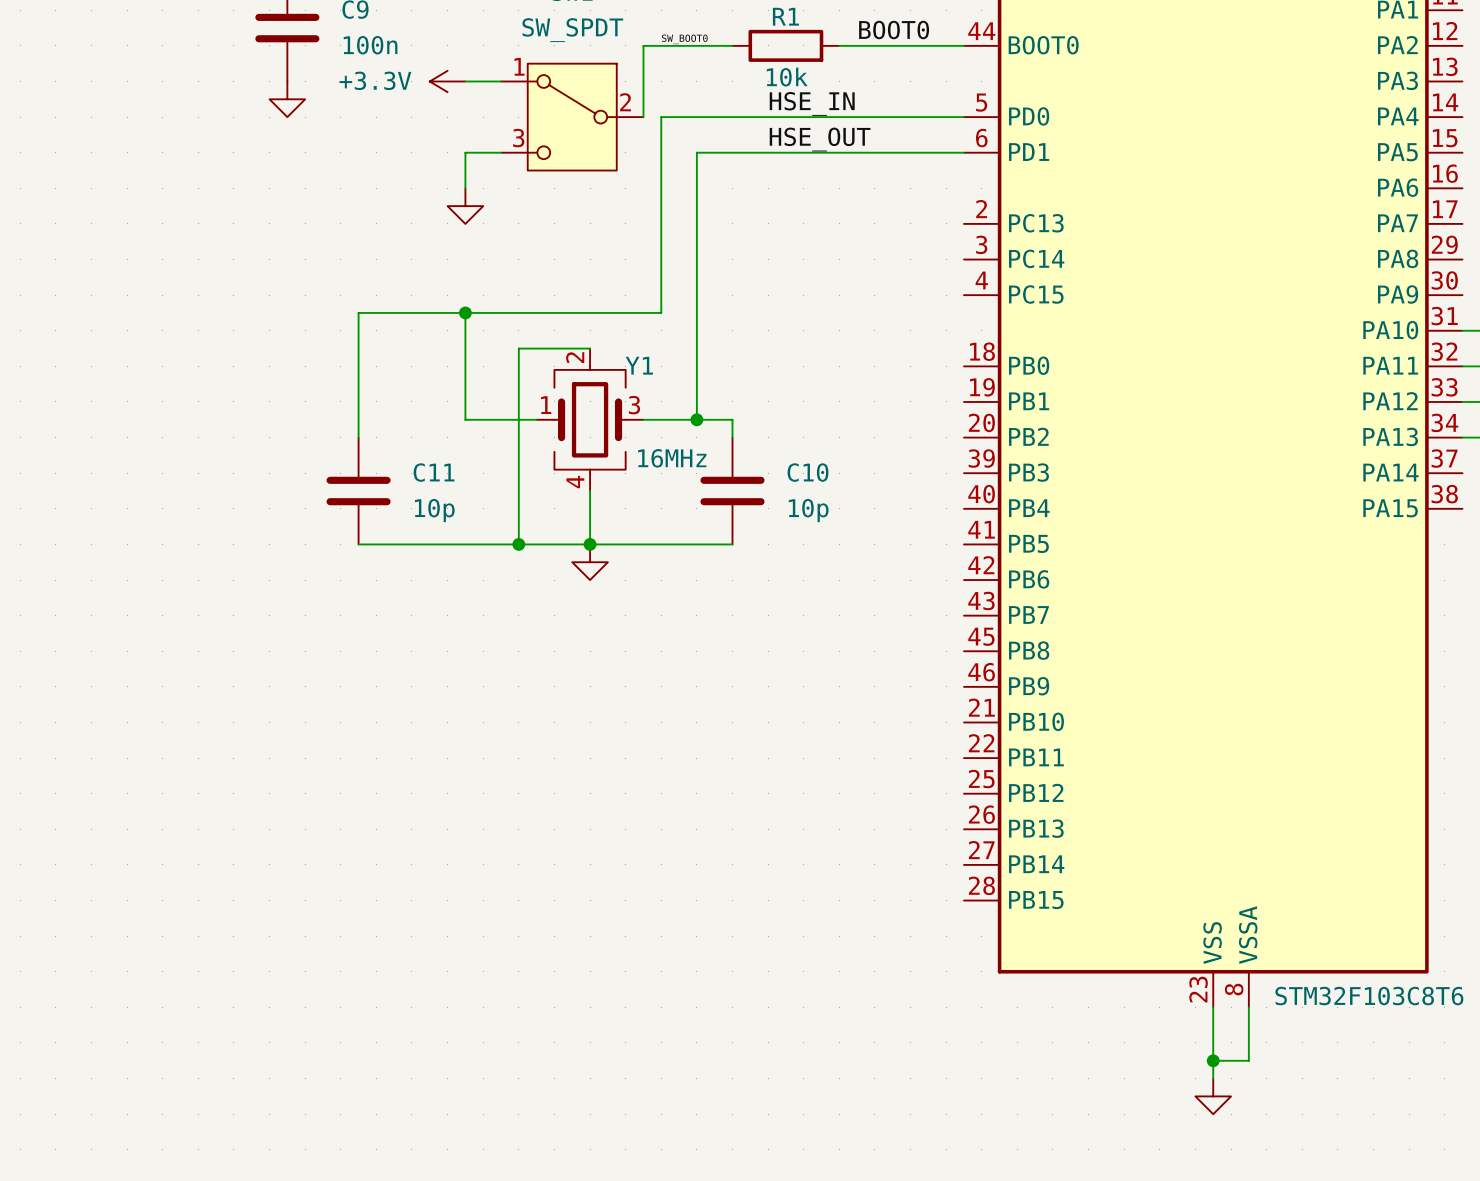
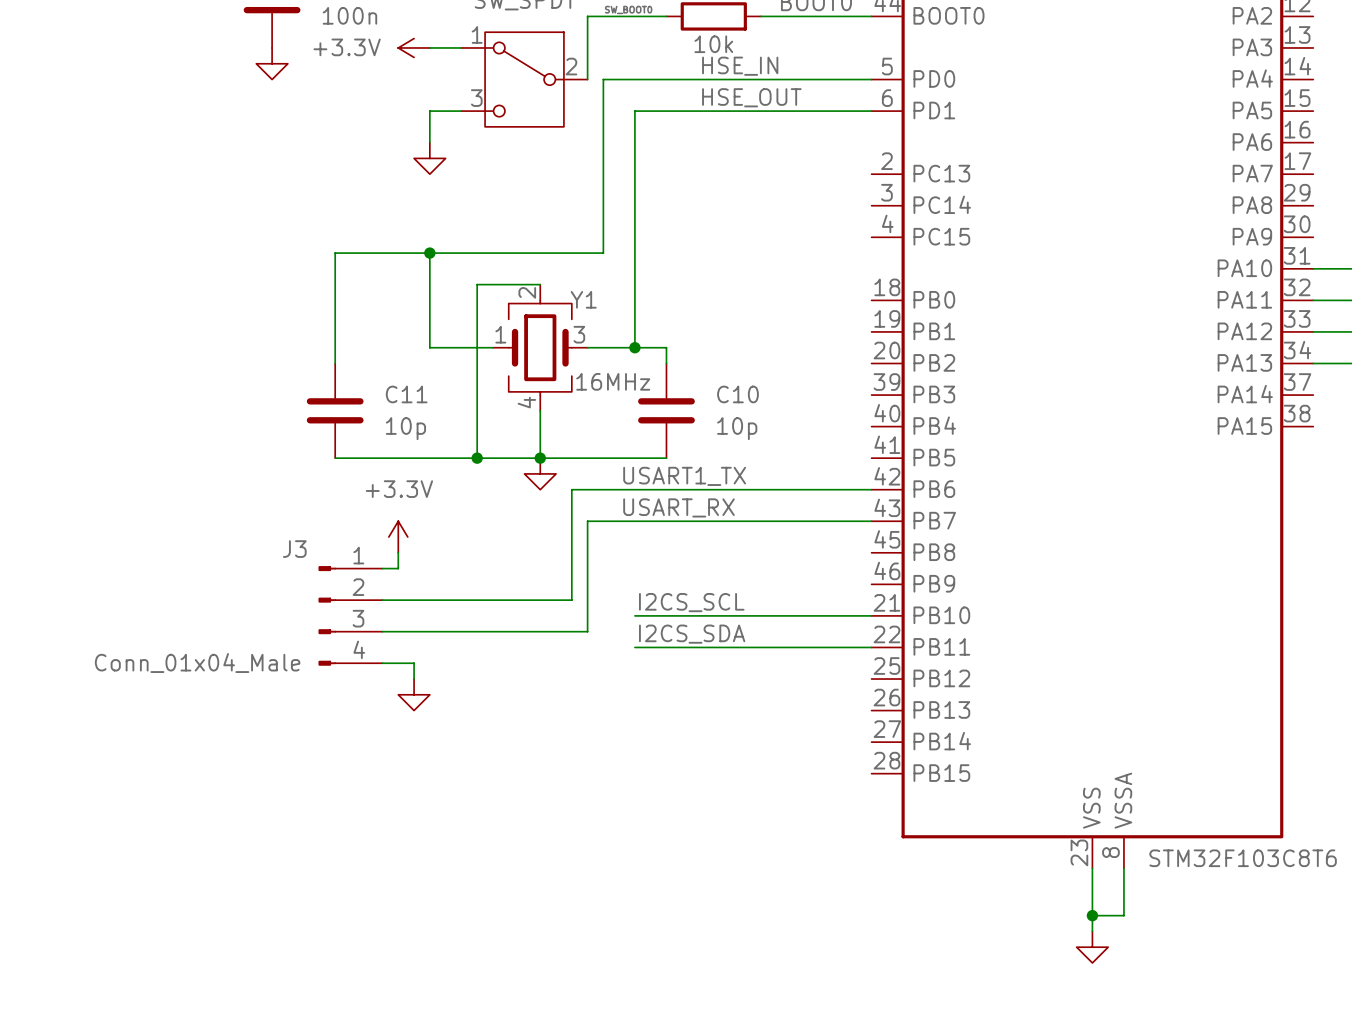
label: none -> USART1_TX (684, 476)
wire: none -> (871, 489) (571, 489) (571, 600) (382, 600)
label: none -> USART_RX (678, 507)
wire: none -> (871, 521) (587, 521) (587, 631) (382, 631)
power symbol: none -> +3.3V (398, 537)
wire: none -> (398, 552) (398, 568) (382, 568)
label: none -> I2CS_SCL (691, 602)
J3: none -> Conn_01x04_Male (350, 615)
wire: none -> (634, 615) (871, 615)
label: none -> I2CS_SDA (692, 634)
wire: none -> (634, 647) (871, 647)
wire: none -> (382, 663) (414, 663) (414, 679)
power symbol: none -> (414, 694)

